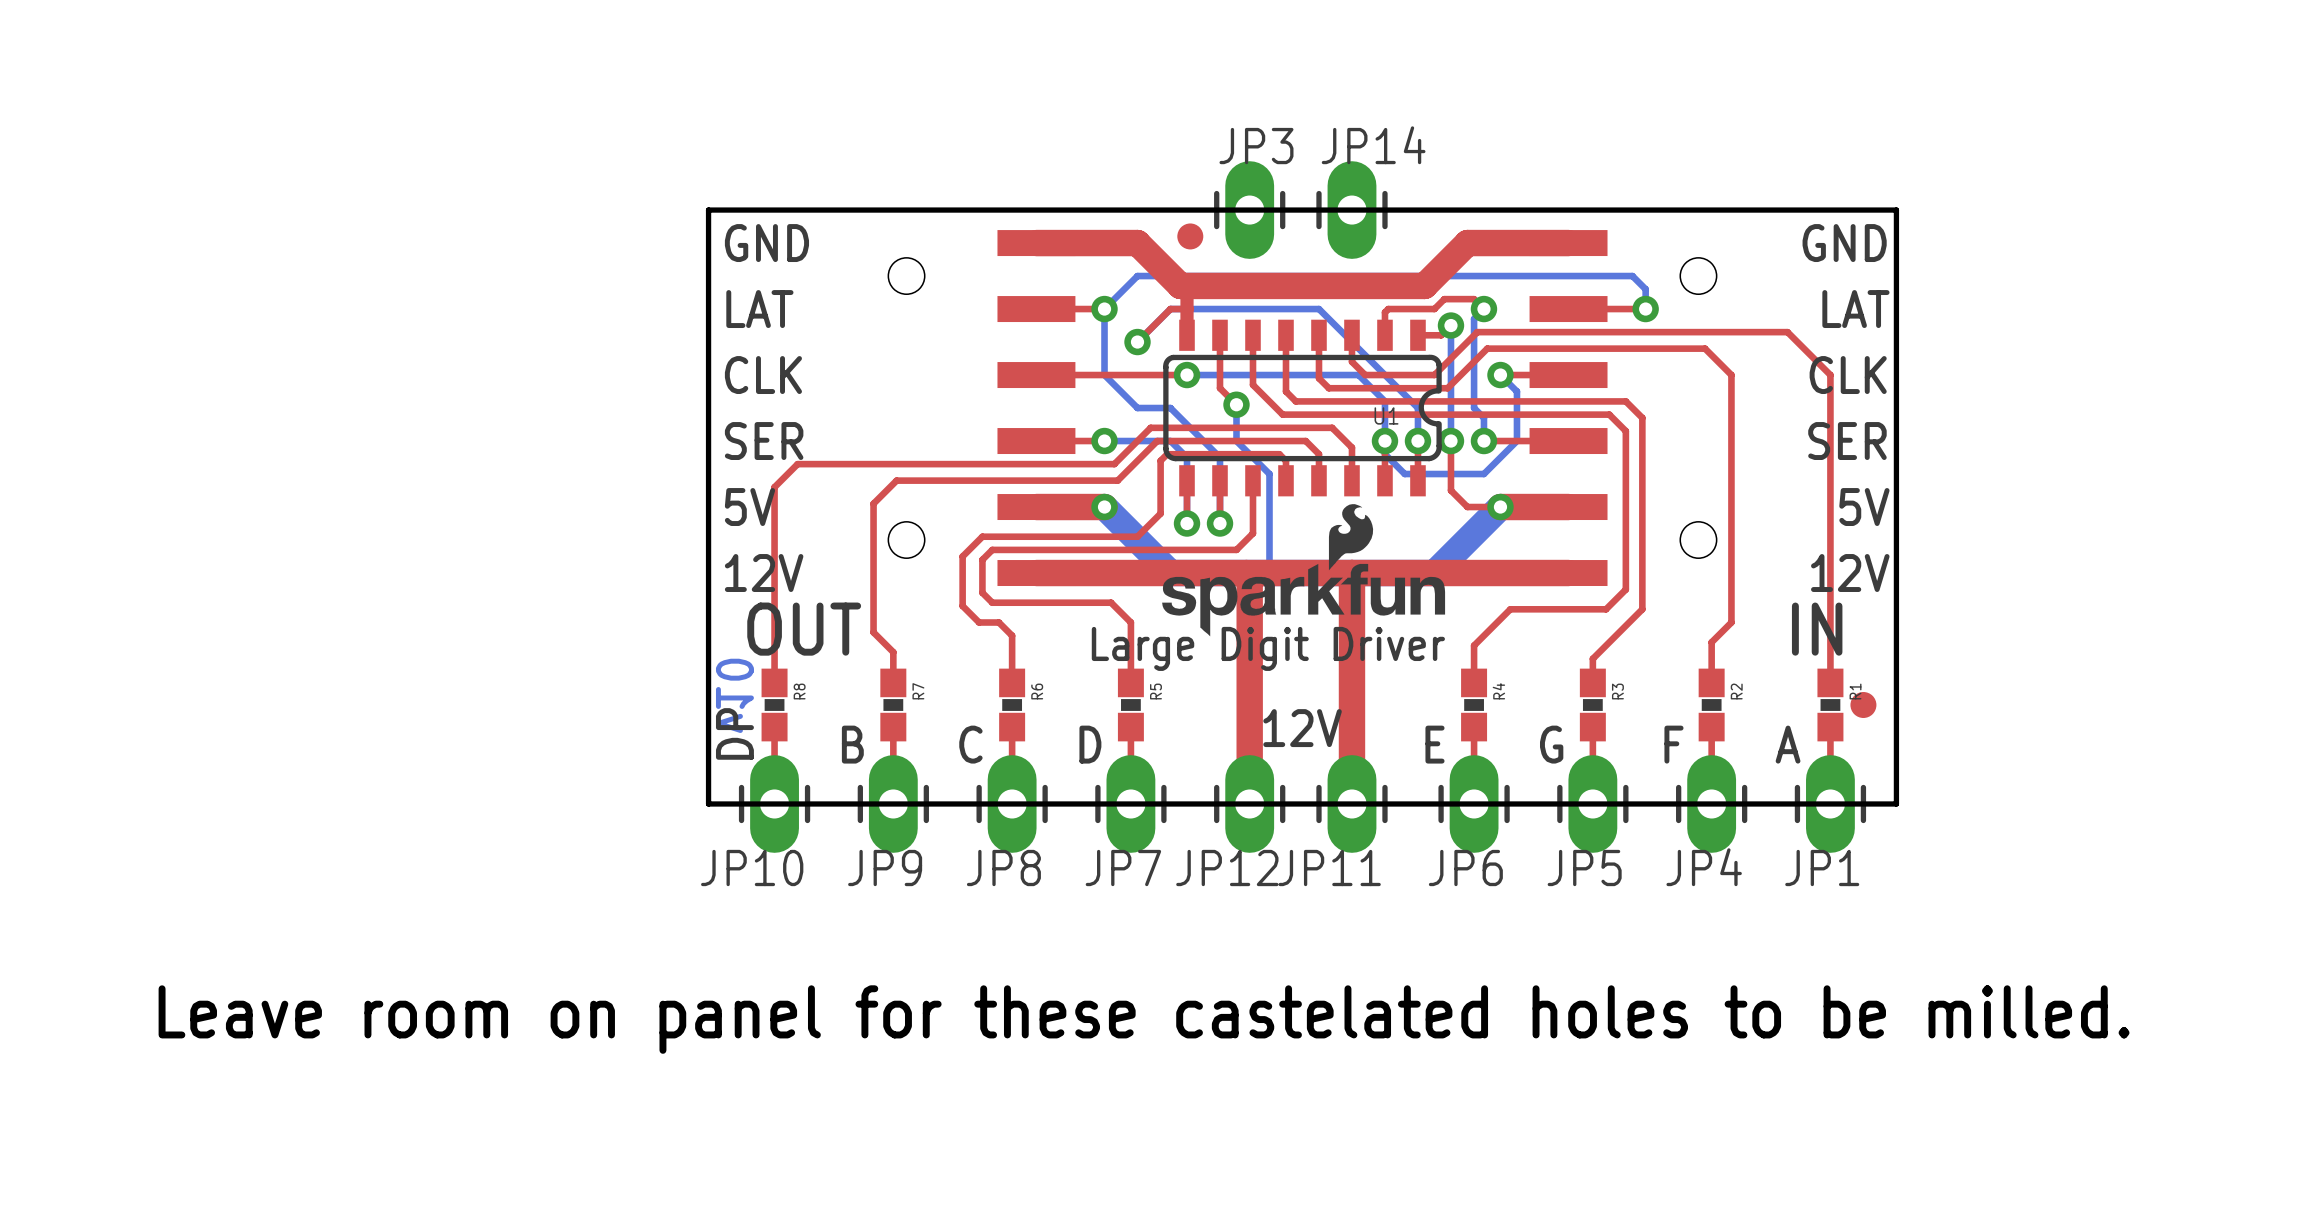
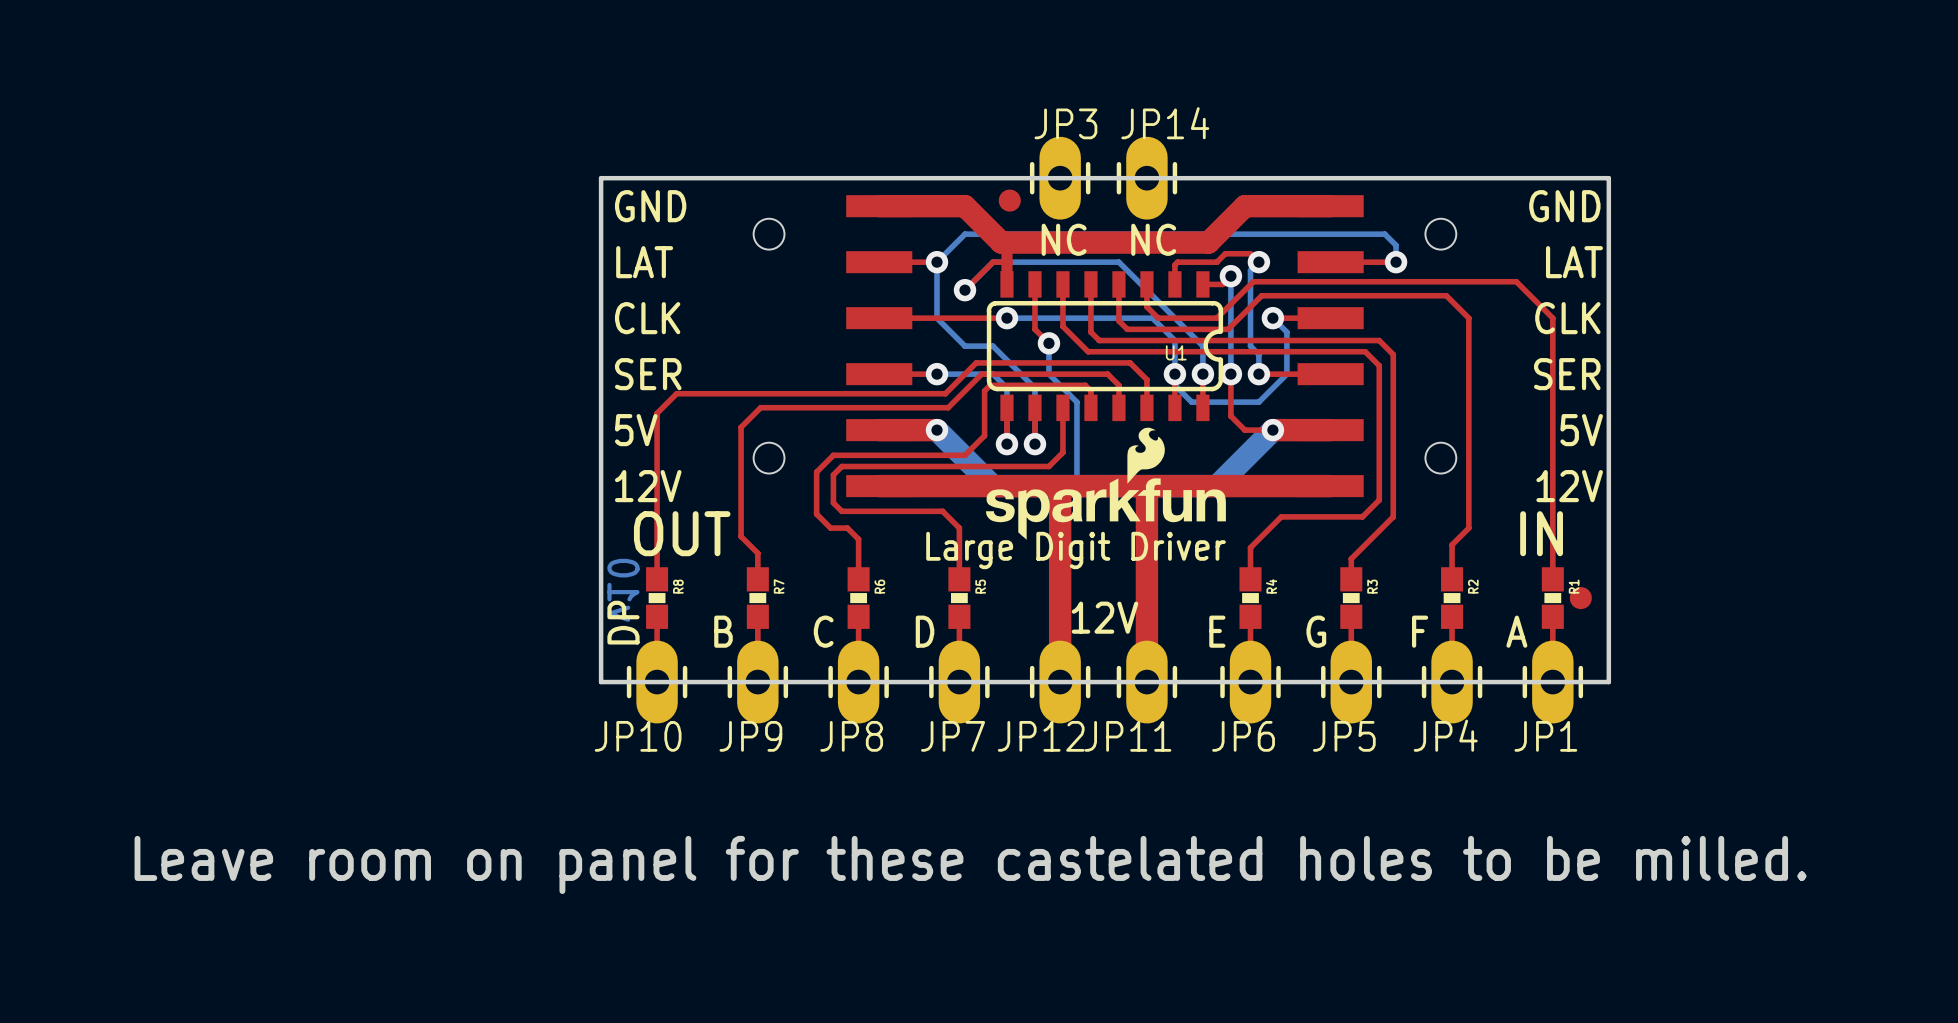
text: none -> NC (1064, 239)
text: none -> NC (1153, 239)

